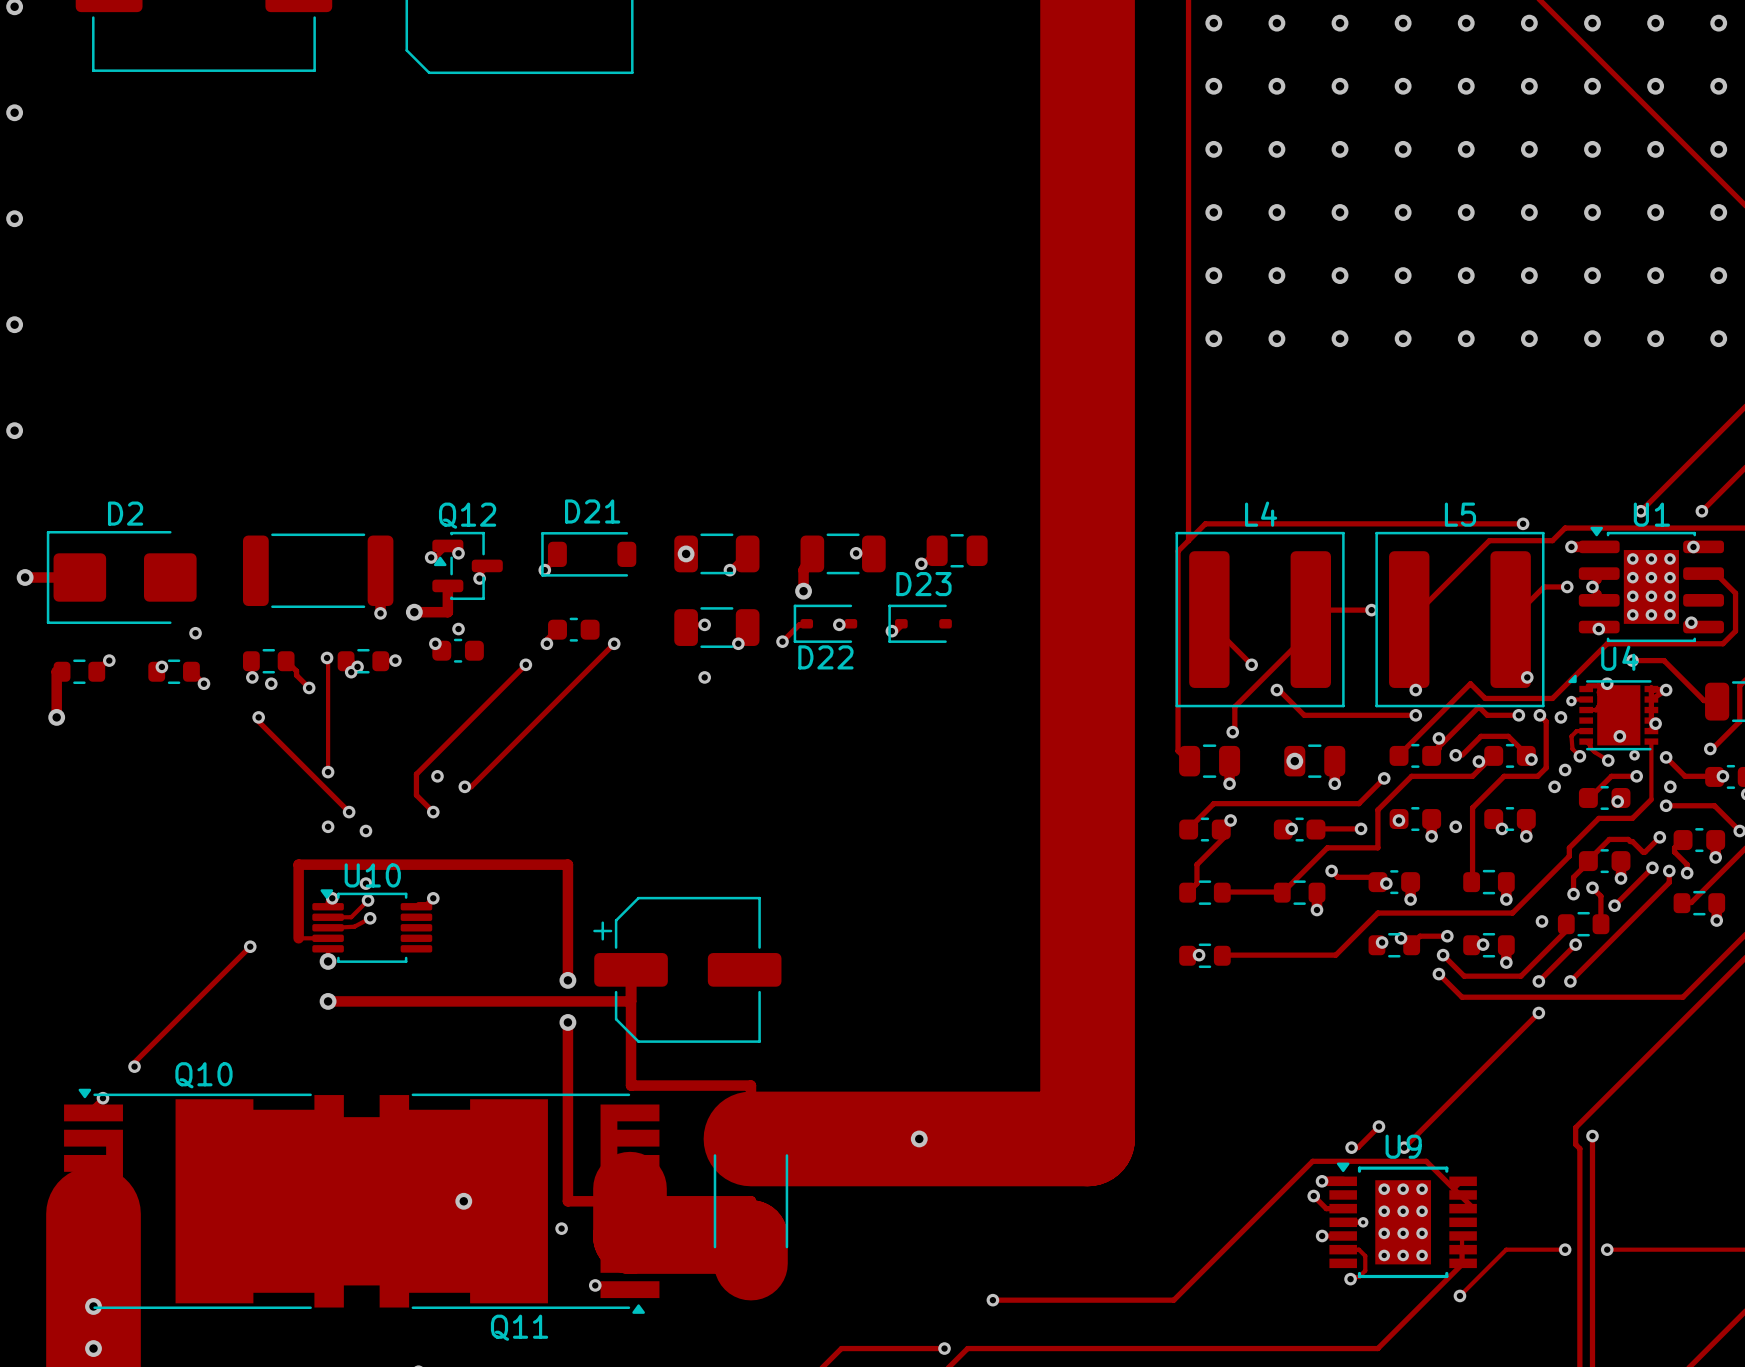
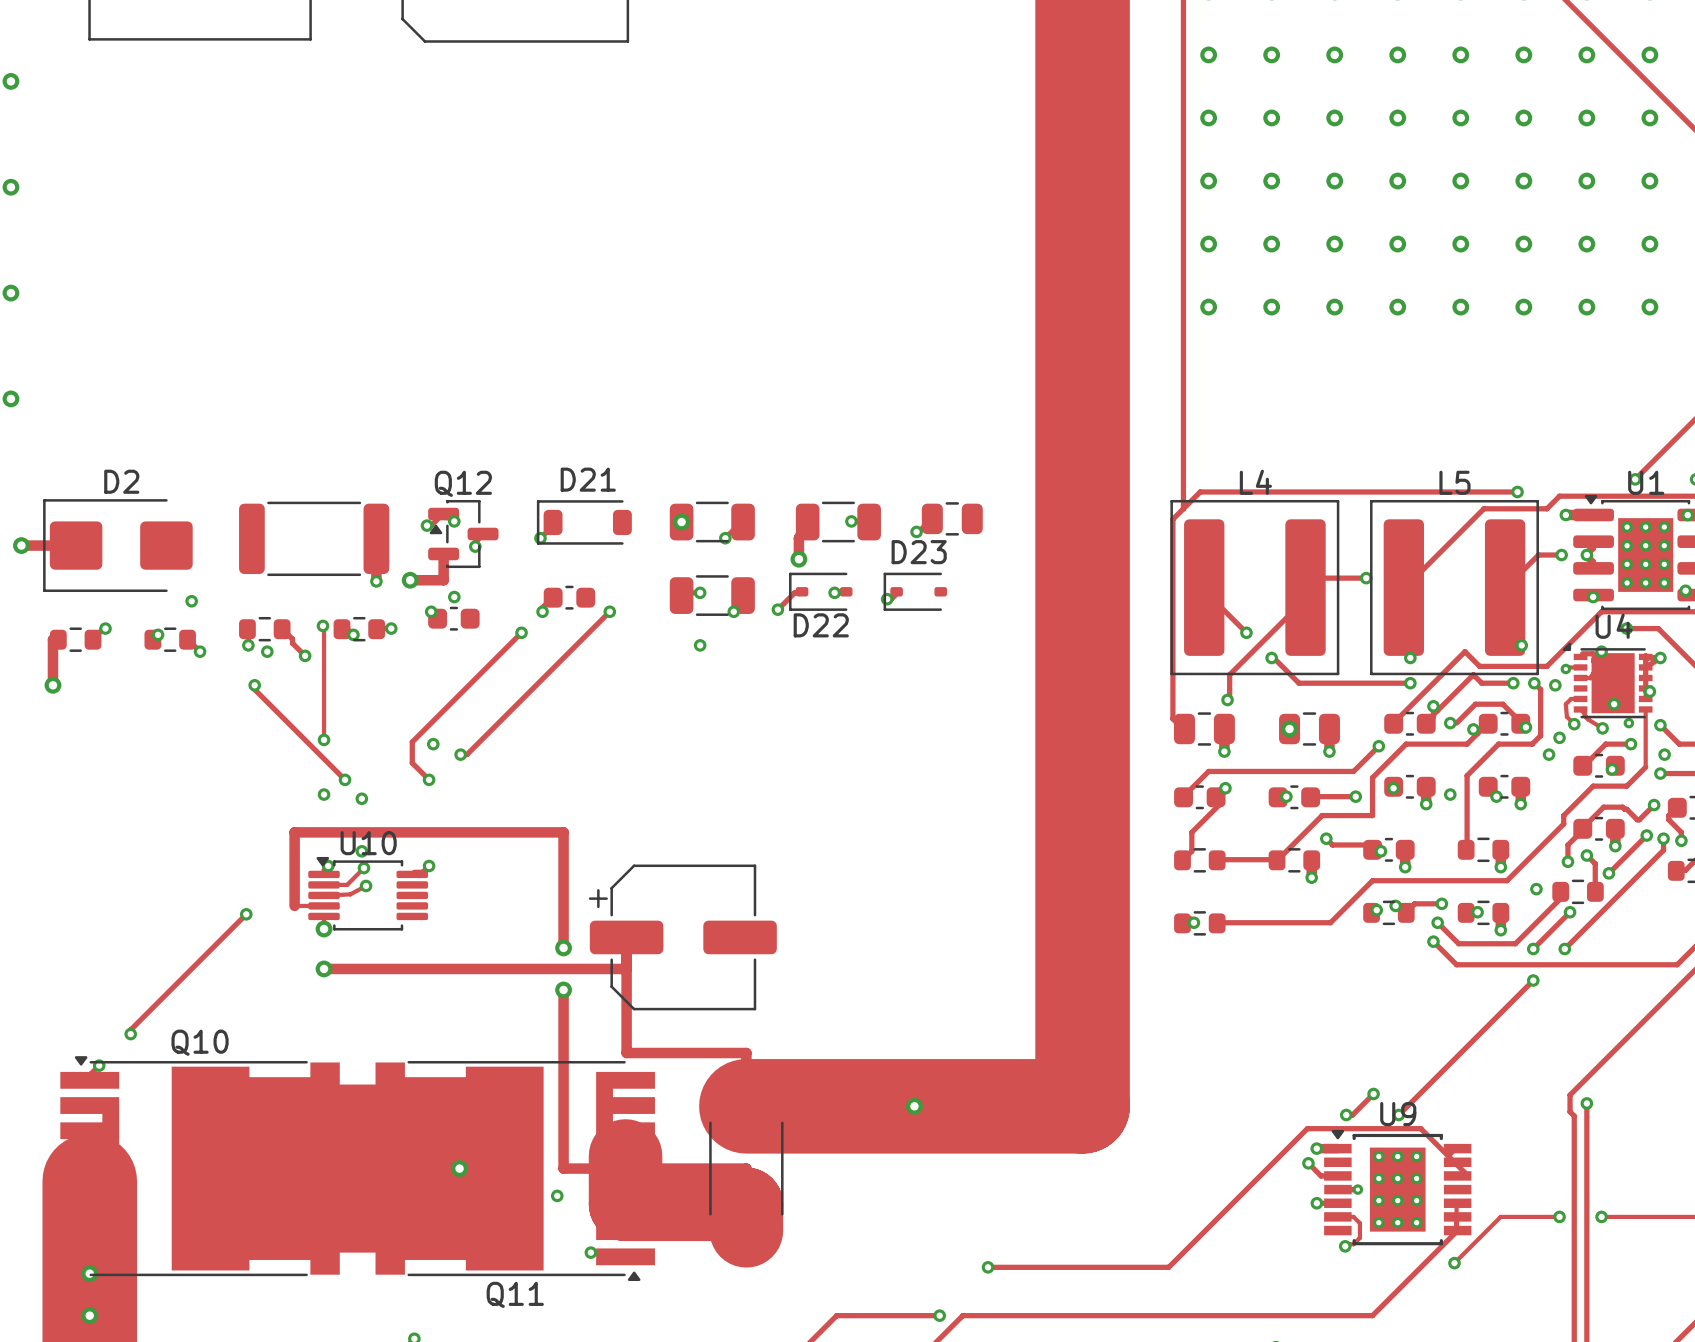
via: (351, 672) -> none

